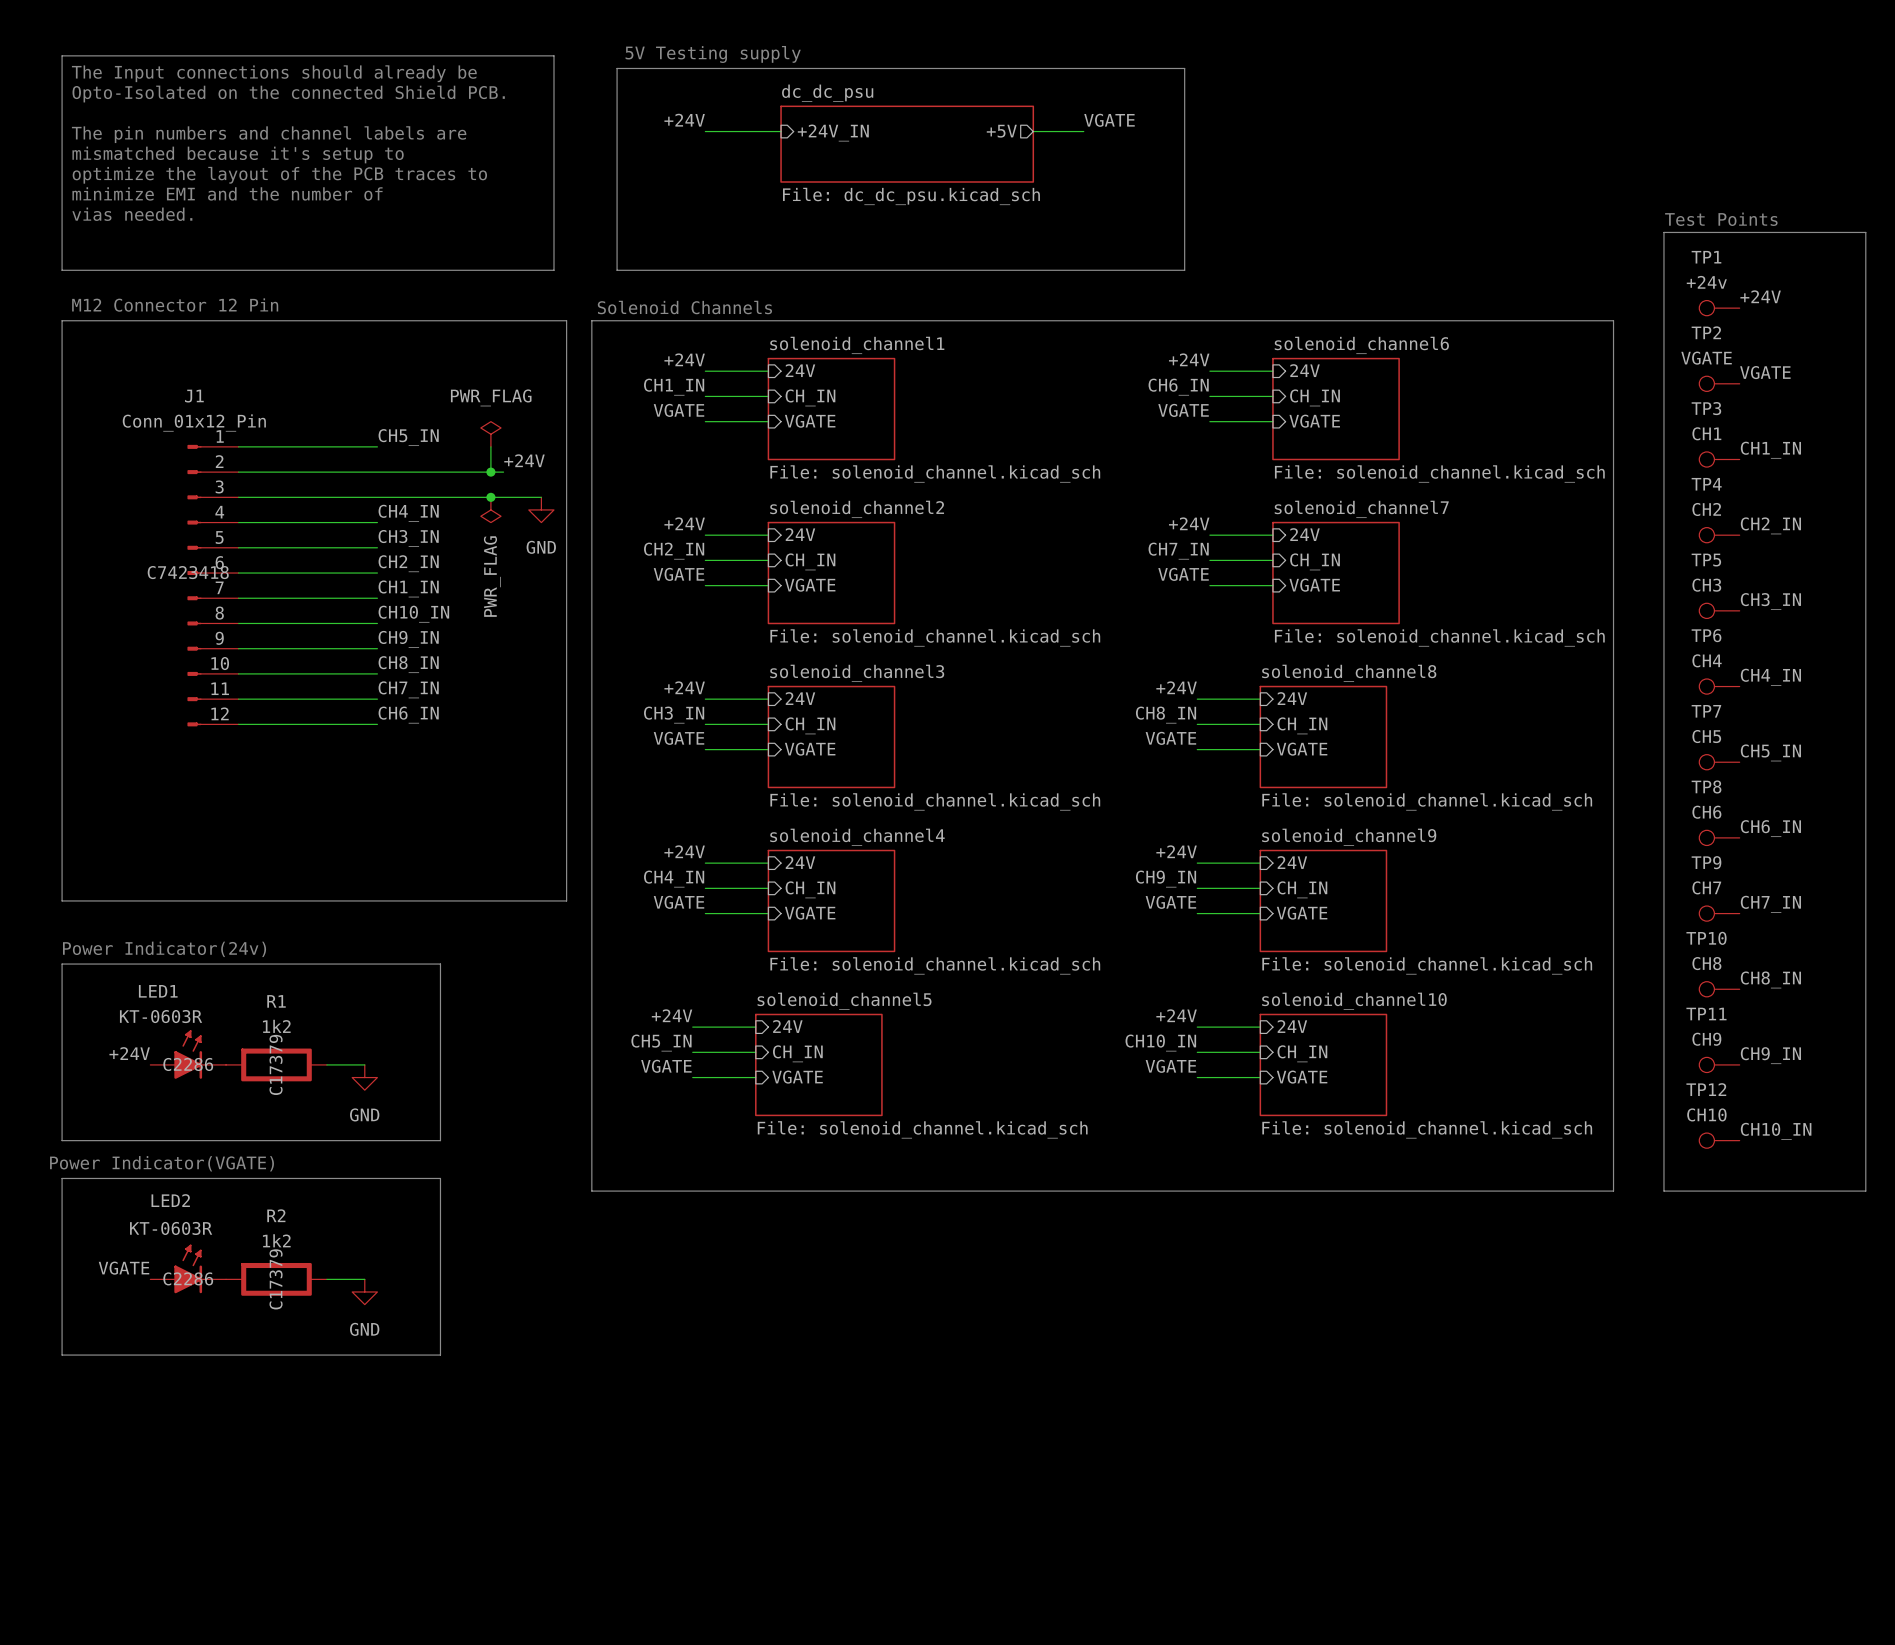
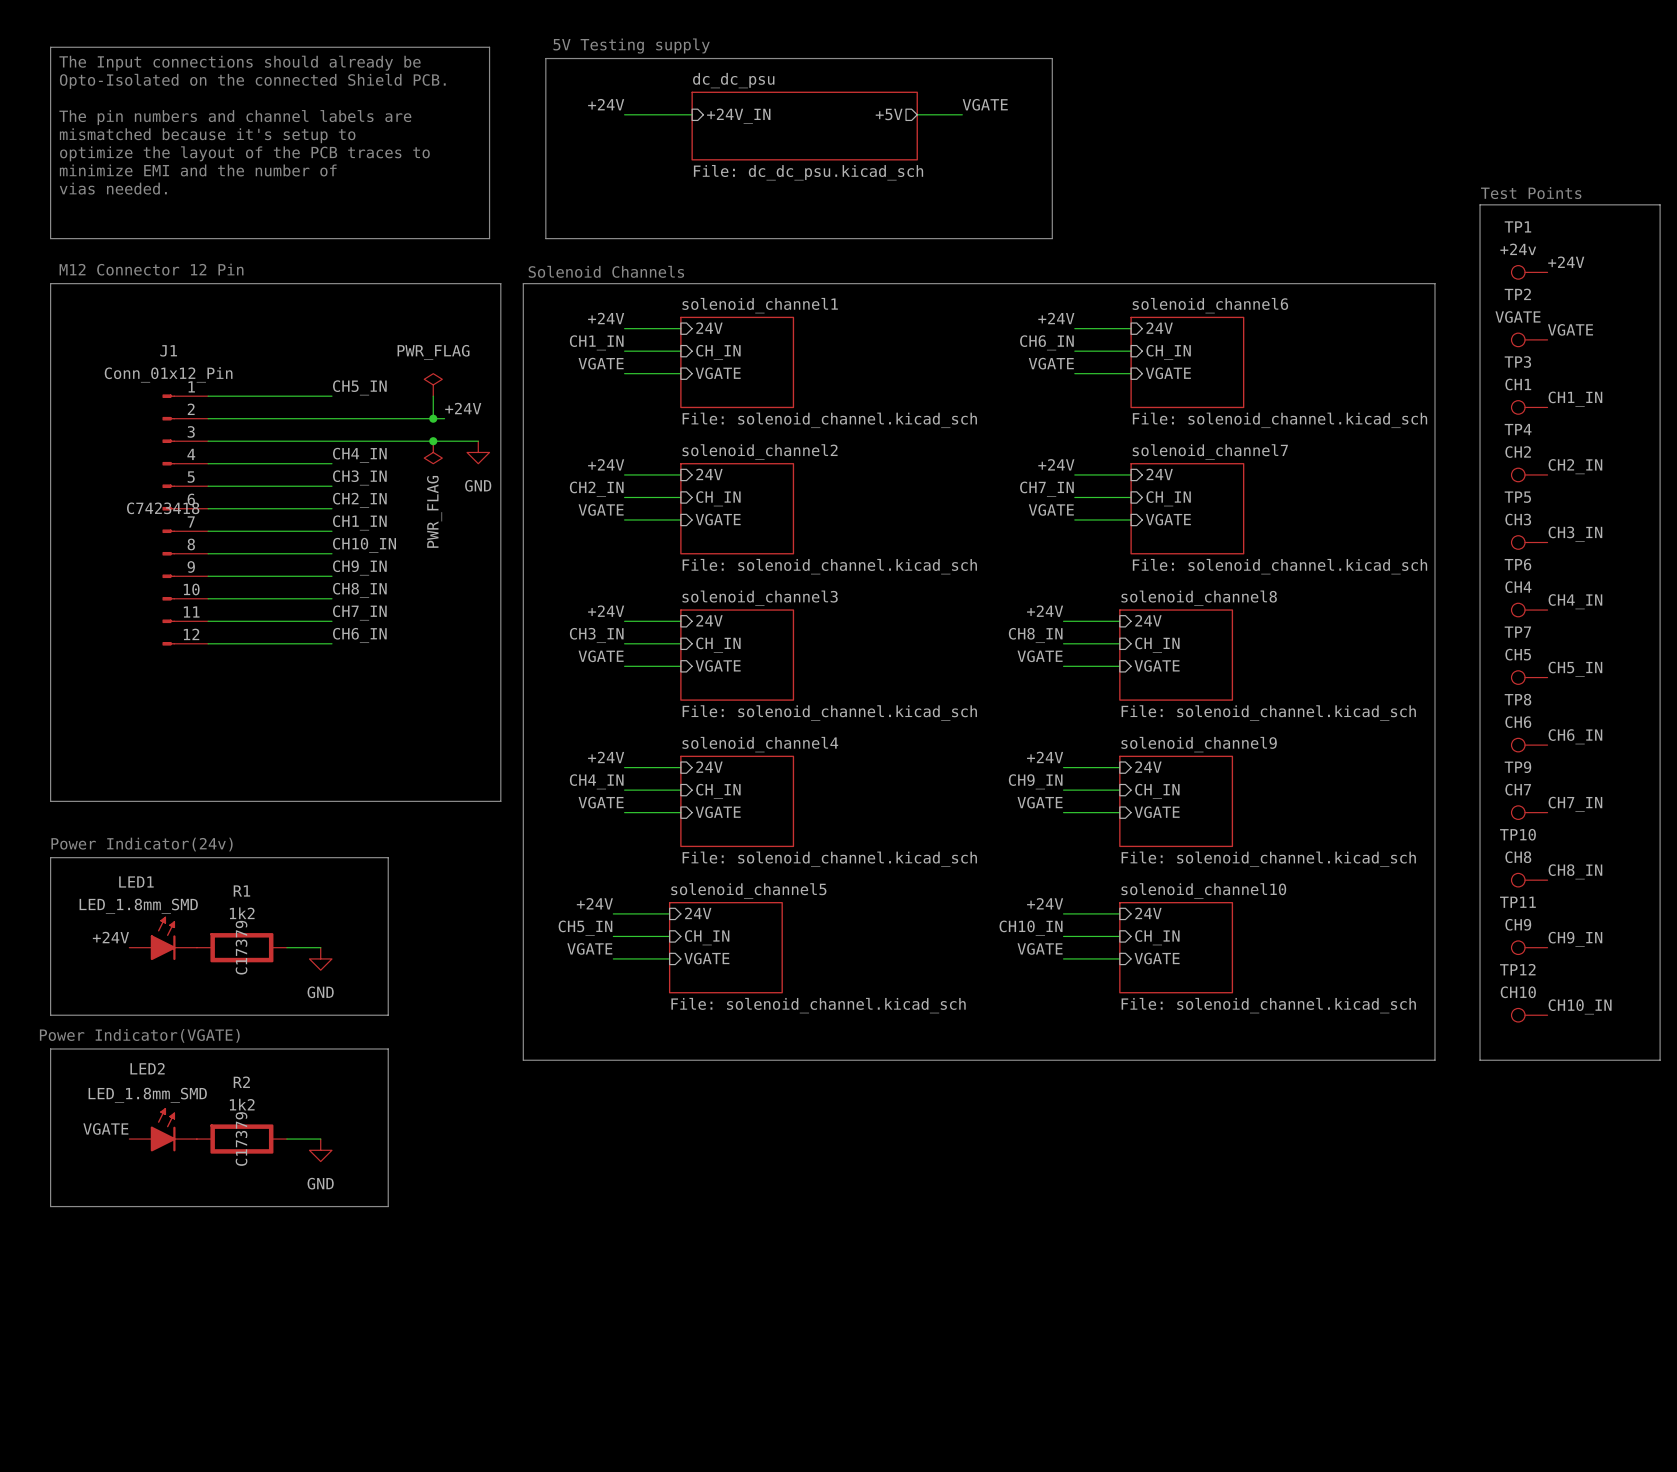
LED1 value: KT-0603R (161, 1016) -> LED_1.8mm_SMD (138, 906)
LED1 text: C2286 (188, 1064) -> none
LED2 value: KT-0603R (171, 1228) -> LED_1.8mm_SMD (147, 1095)
LED2 text: C2286 (188, 1278) -> none

